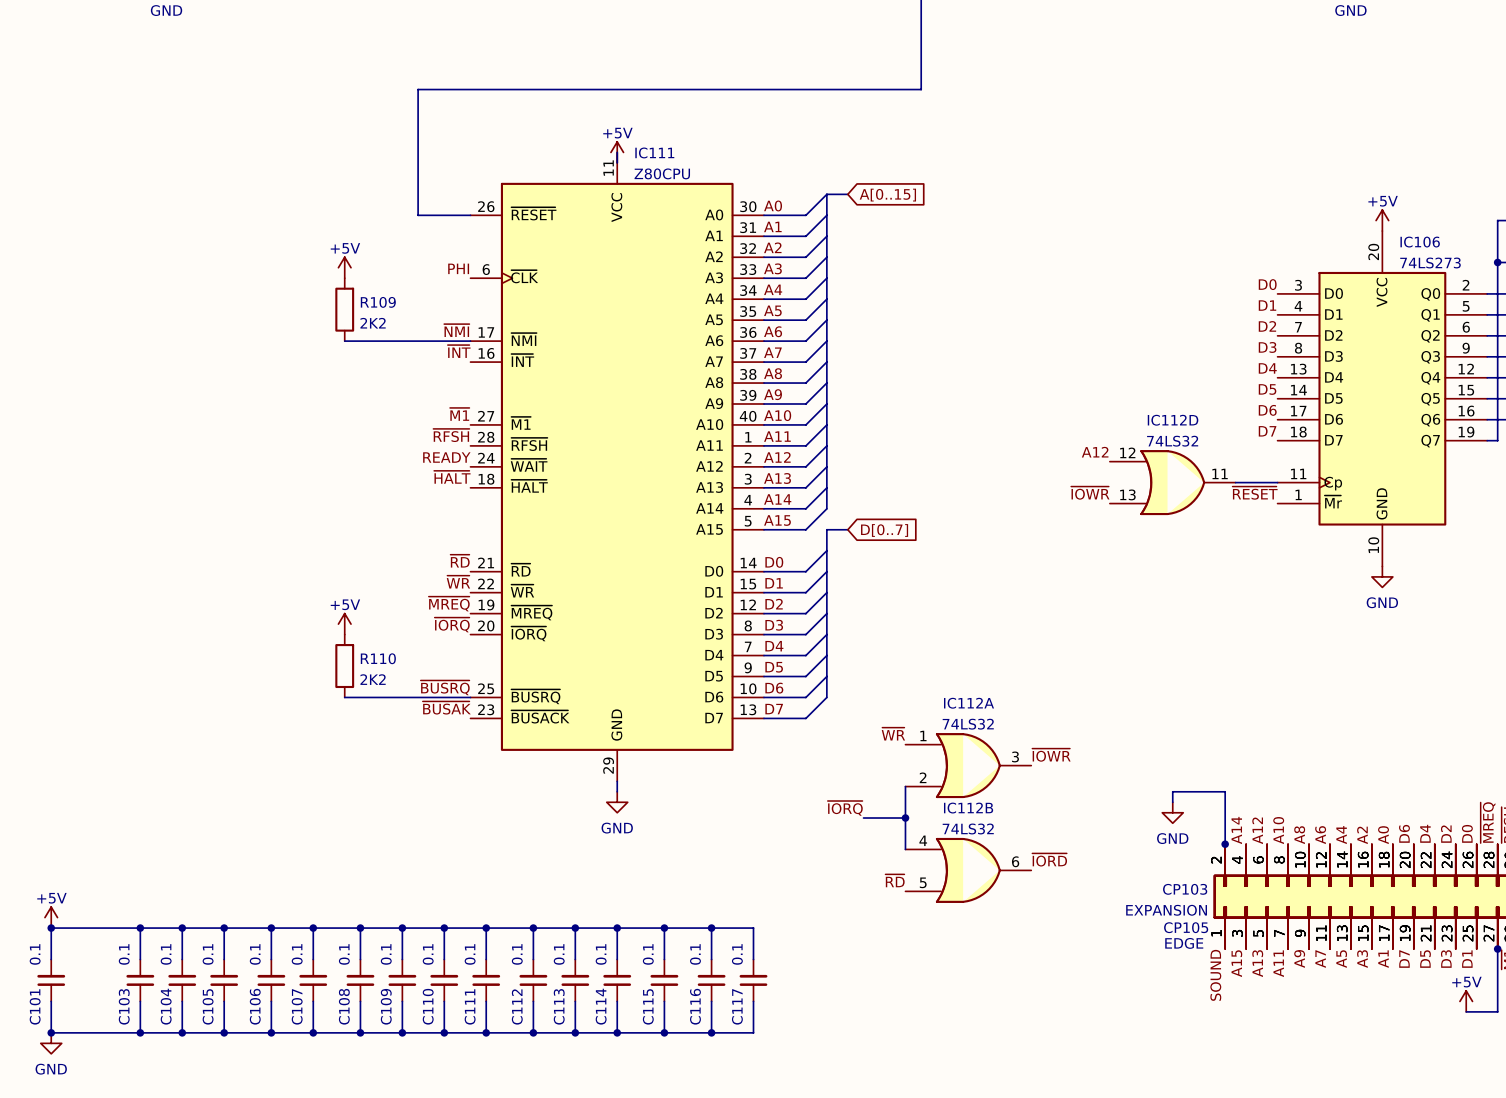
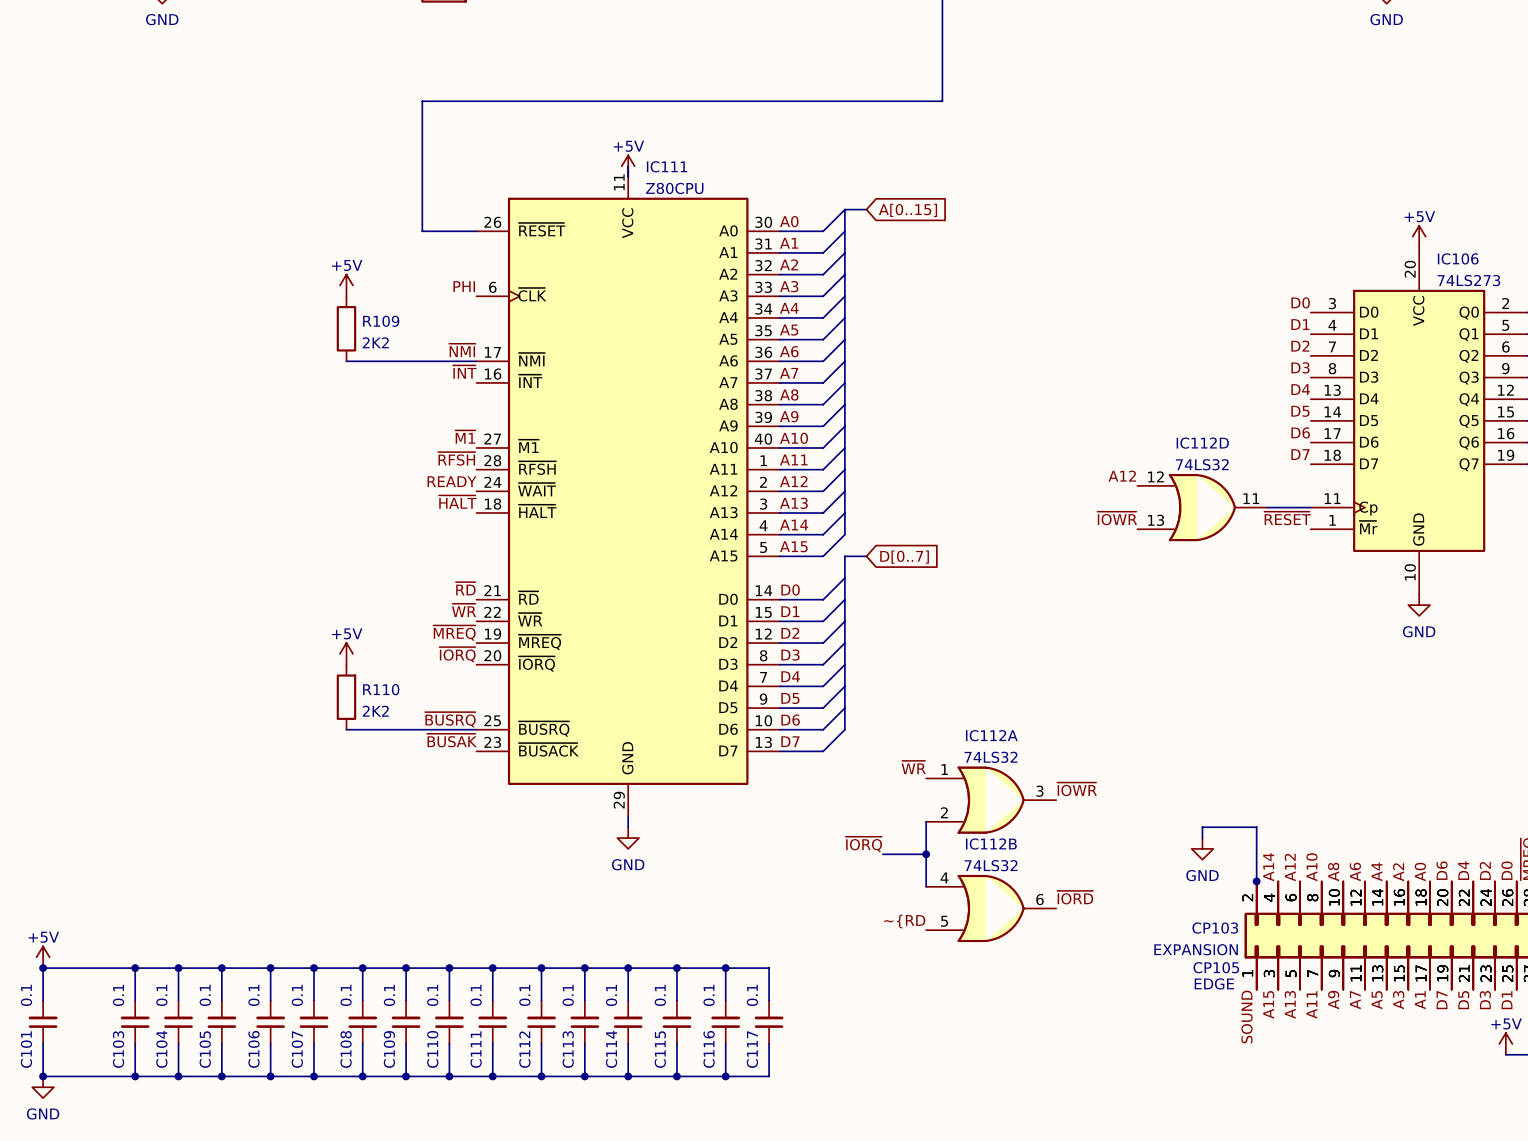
label: ~{RD} (895, 880) -> ~{RD (904, 921)

